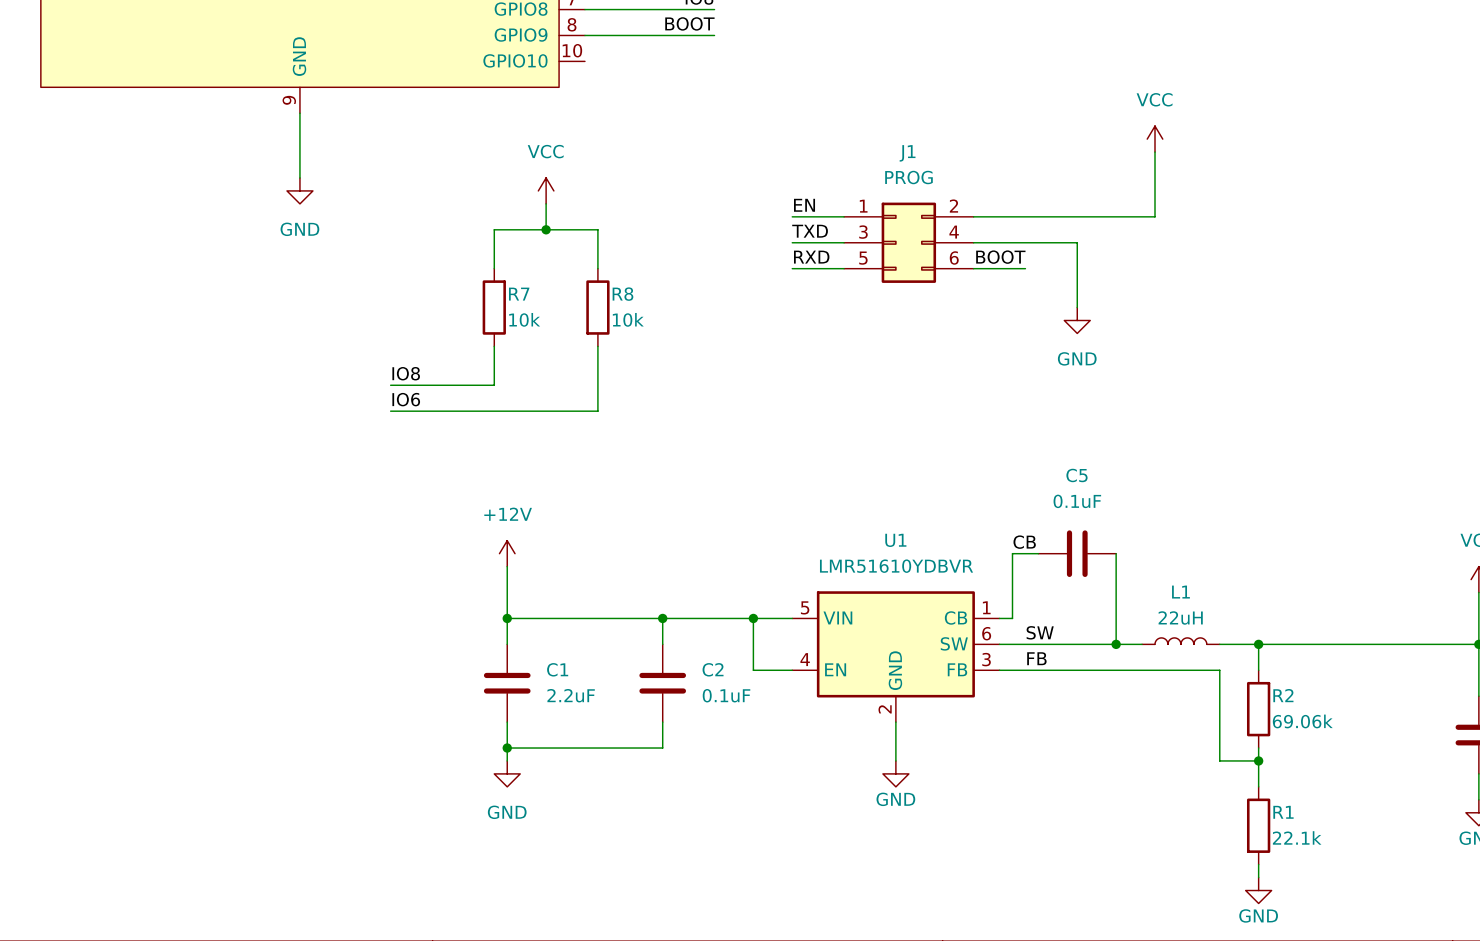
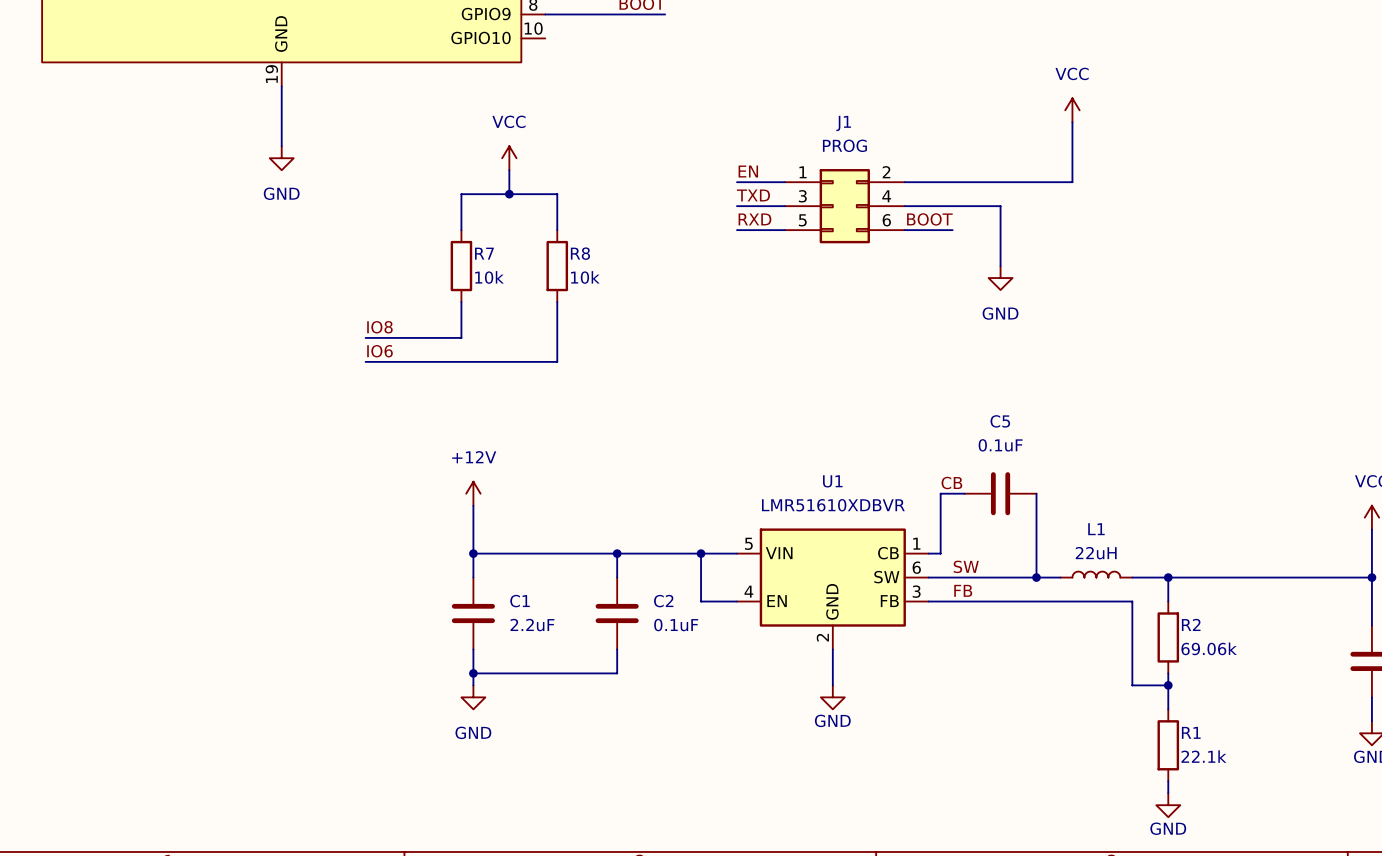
part pin number: 9 (289, 100) -> 19 (271, 74)
U1 value: LMR51610YDBVR (896, 566) -> LMR51610XDBVR (833, 505)

